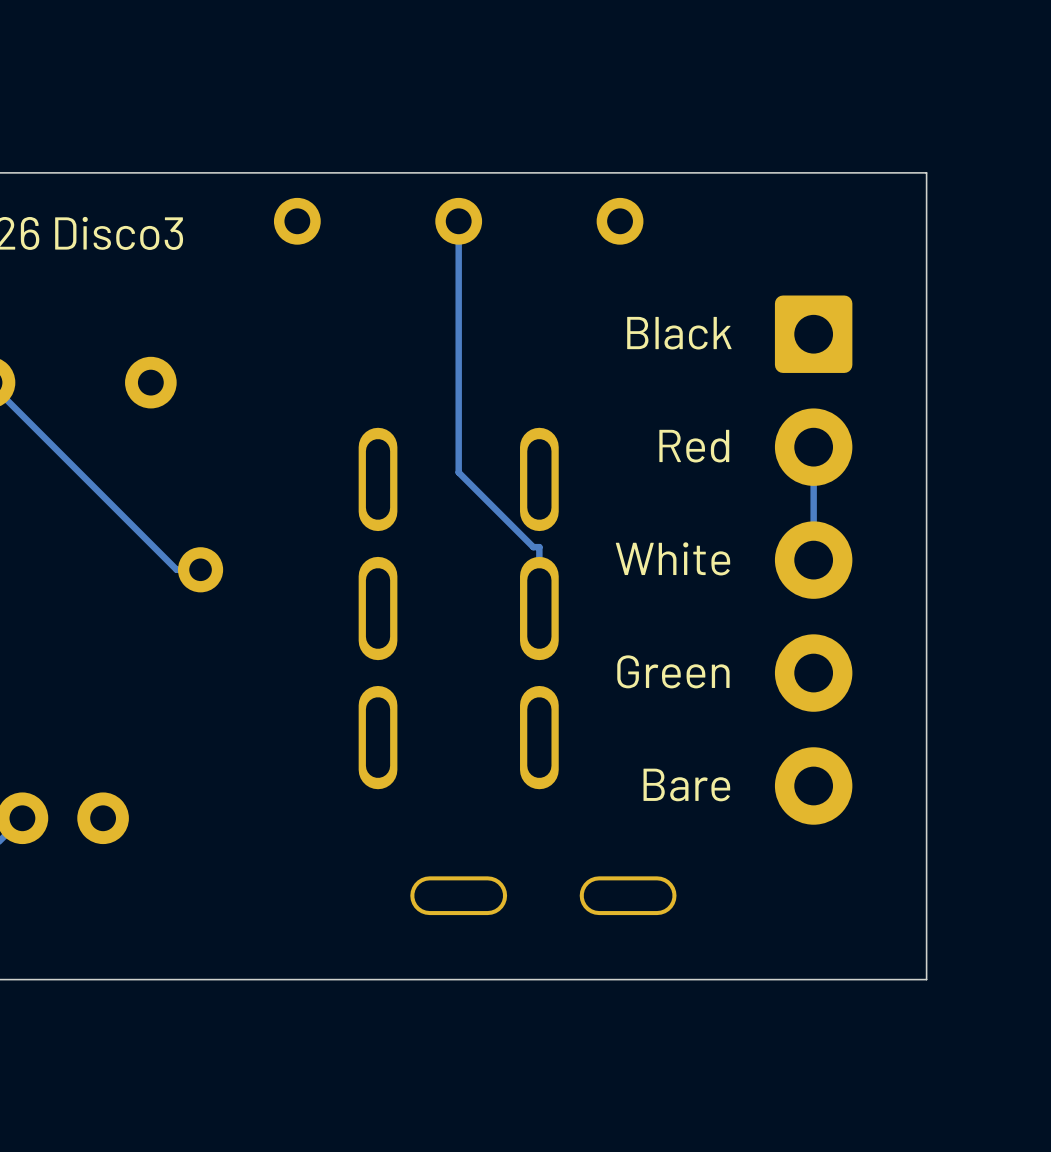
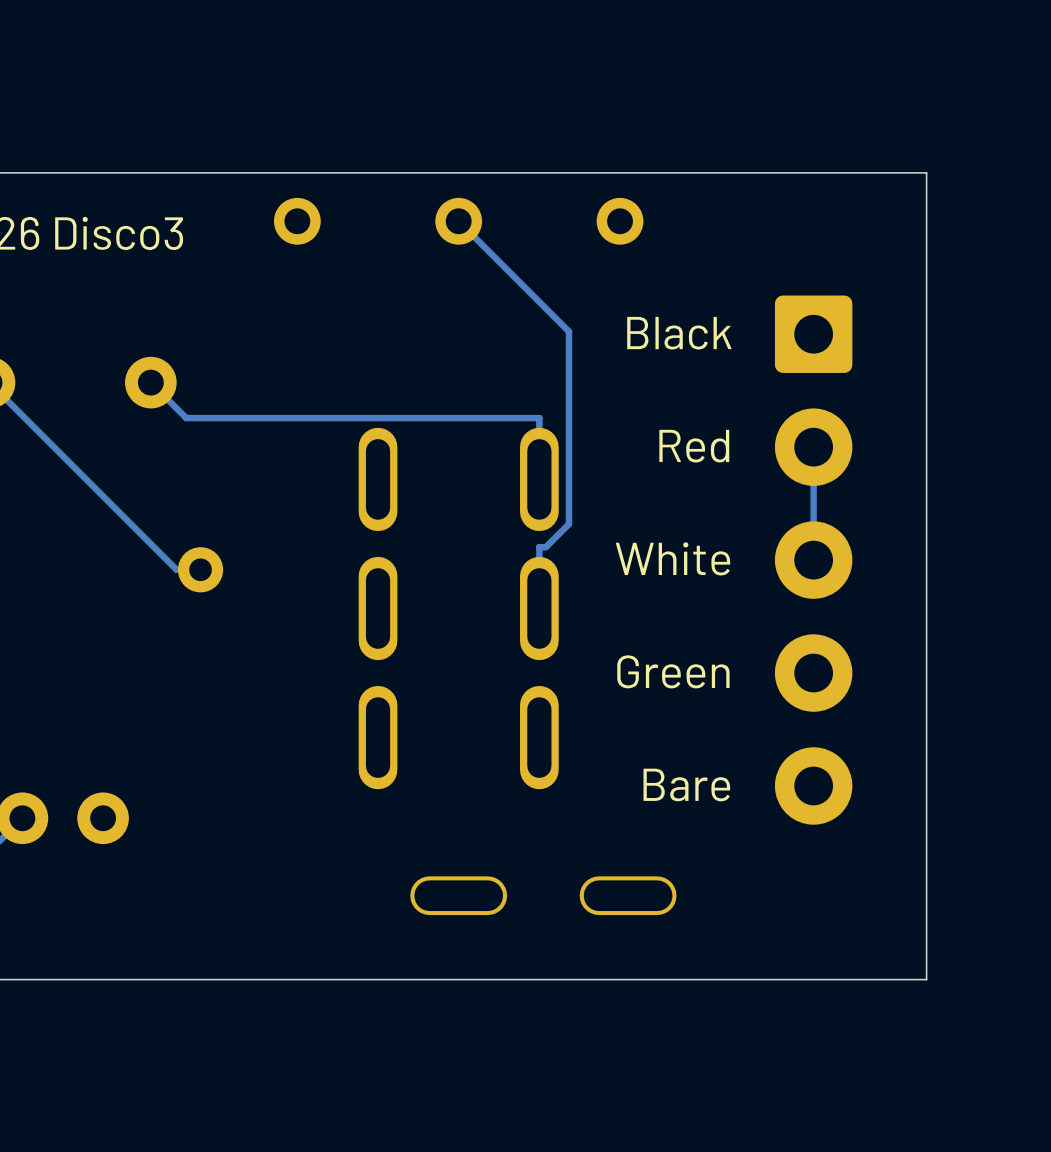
track: (458, 221) (458, 472) (533, 547) (539, 547) -> (458, 221) (569, 331) (569, 524) (545, 547) (539, 547)
track: none -> (150, 382) (186, 418) (539, 418) (539, 479)

